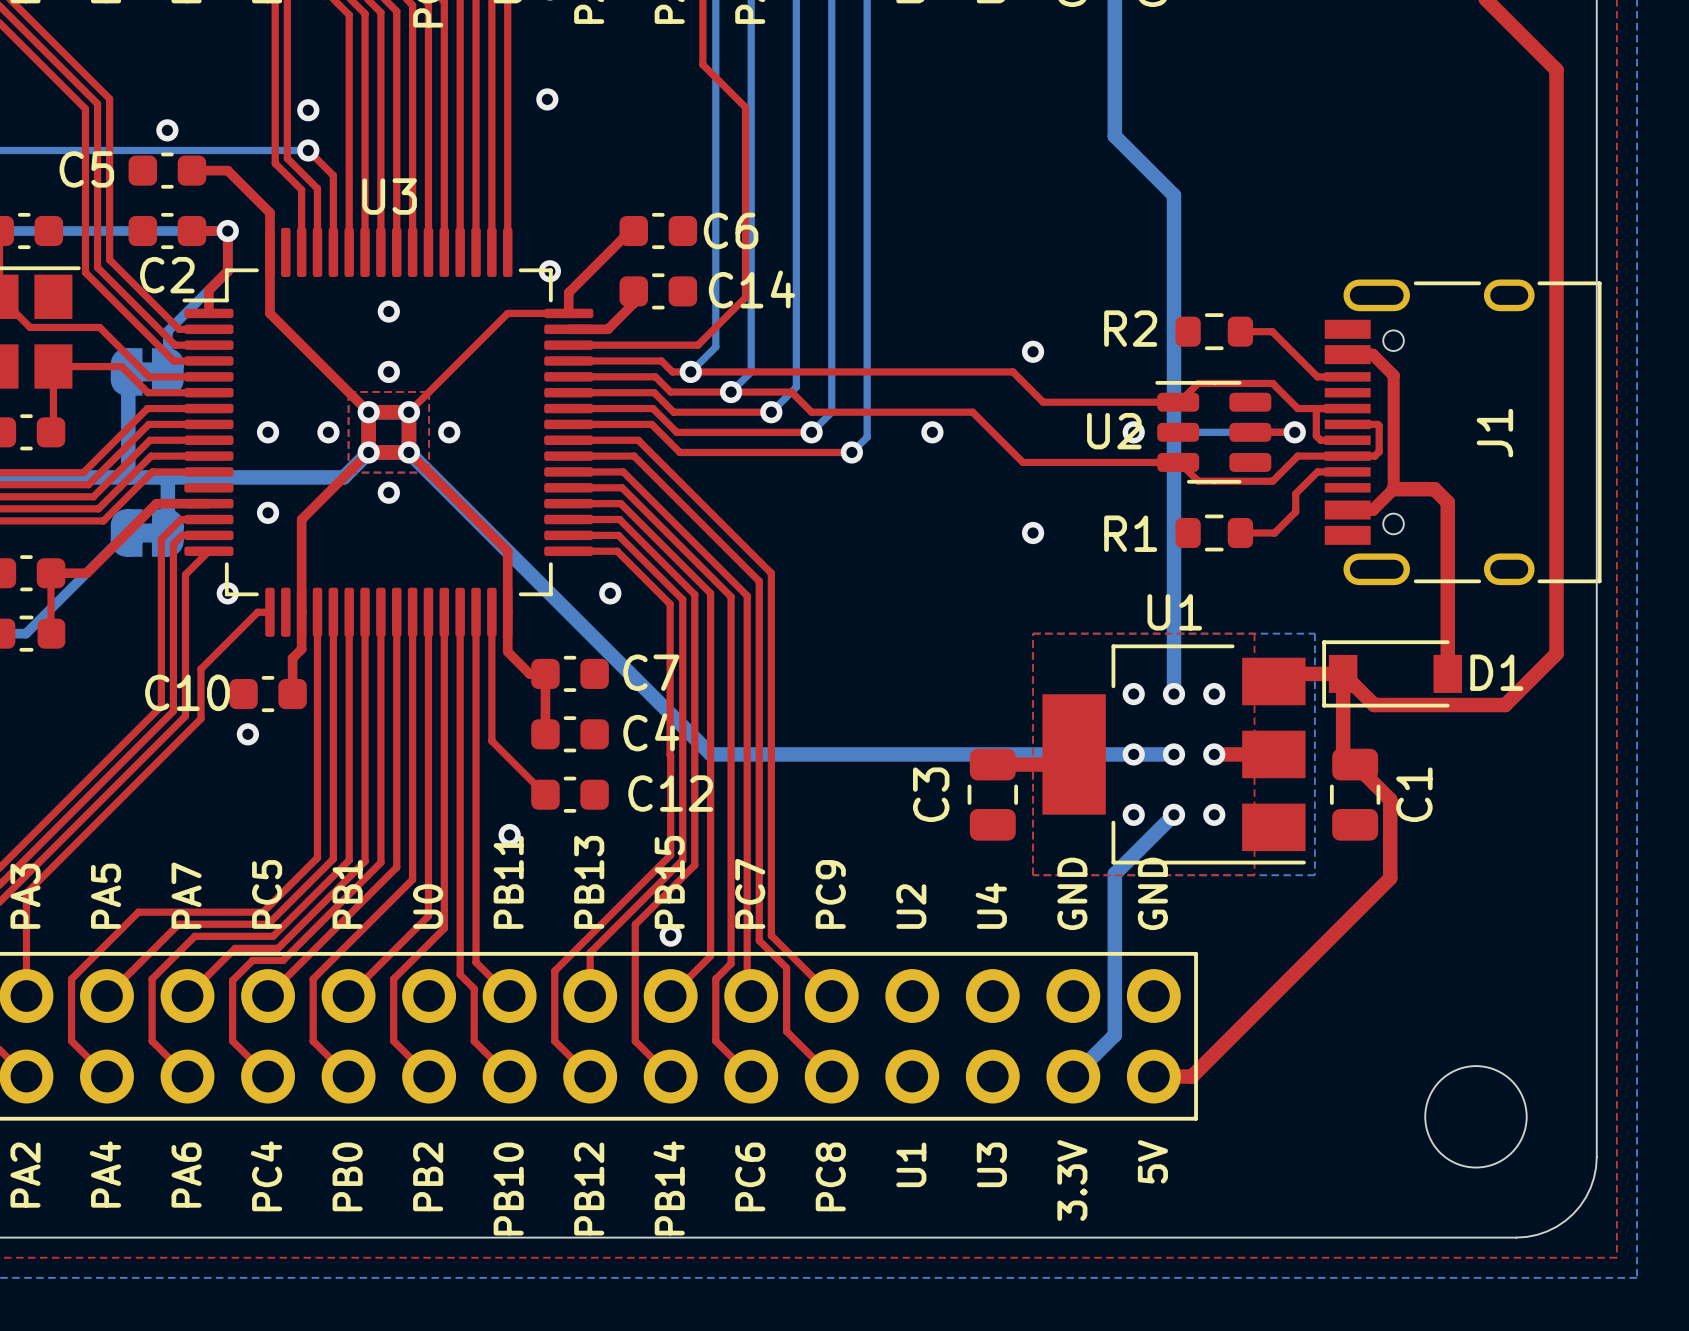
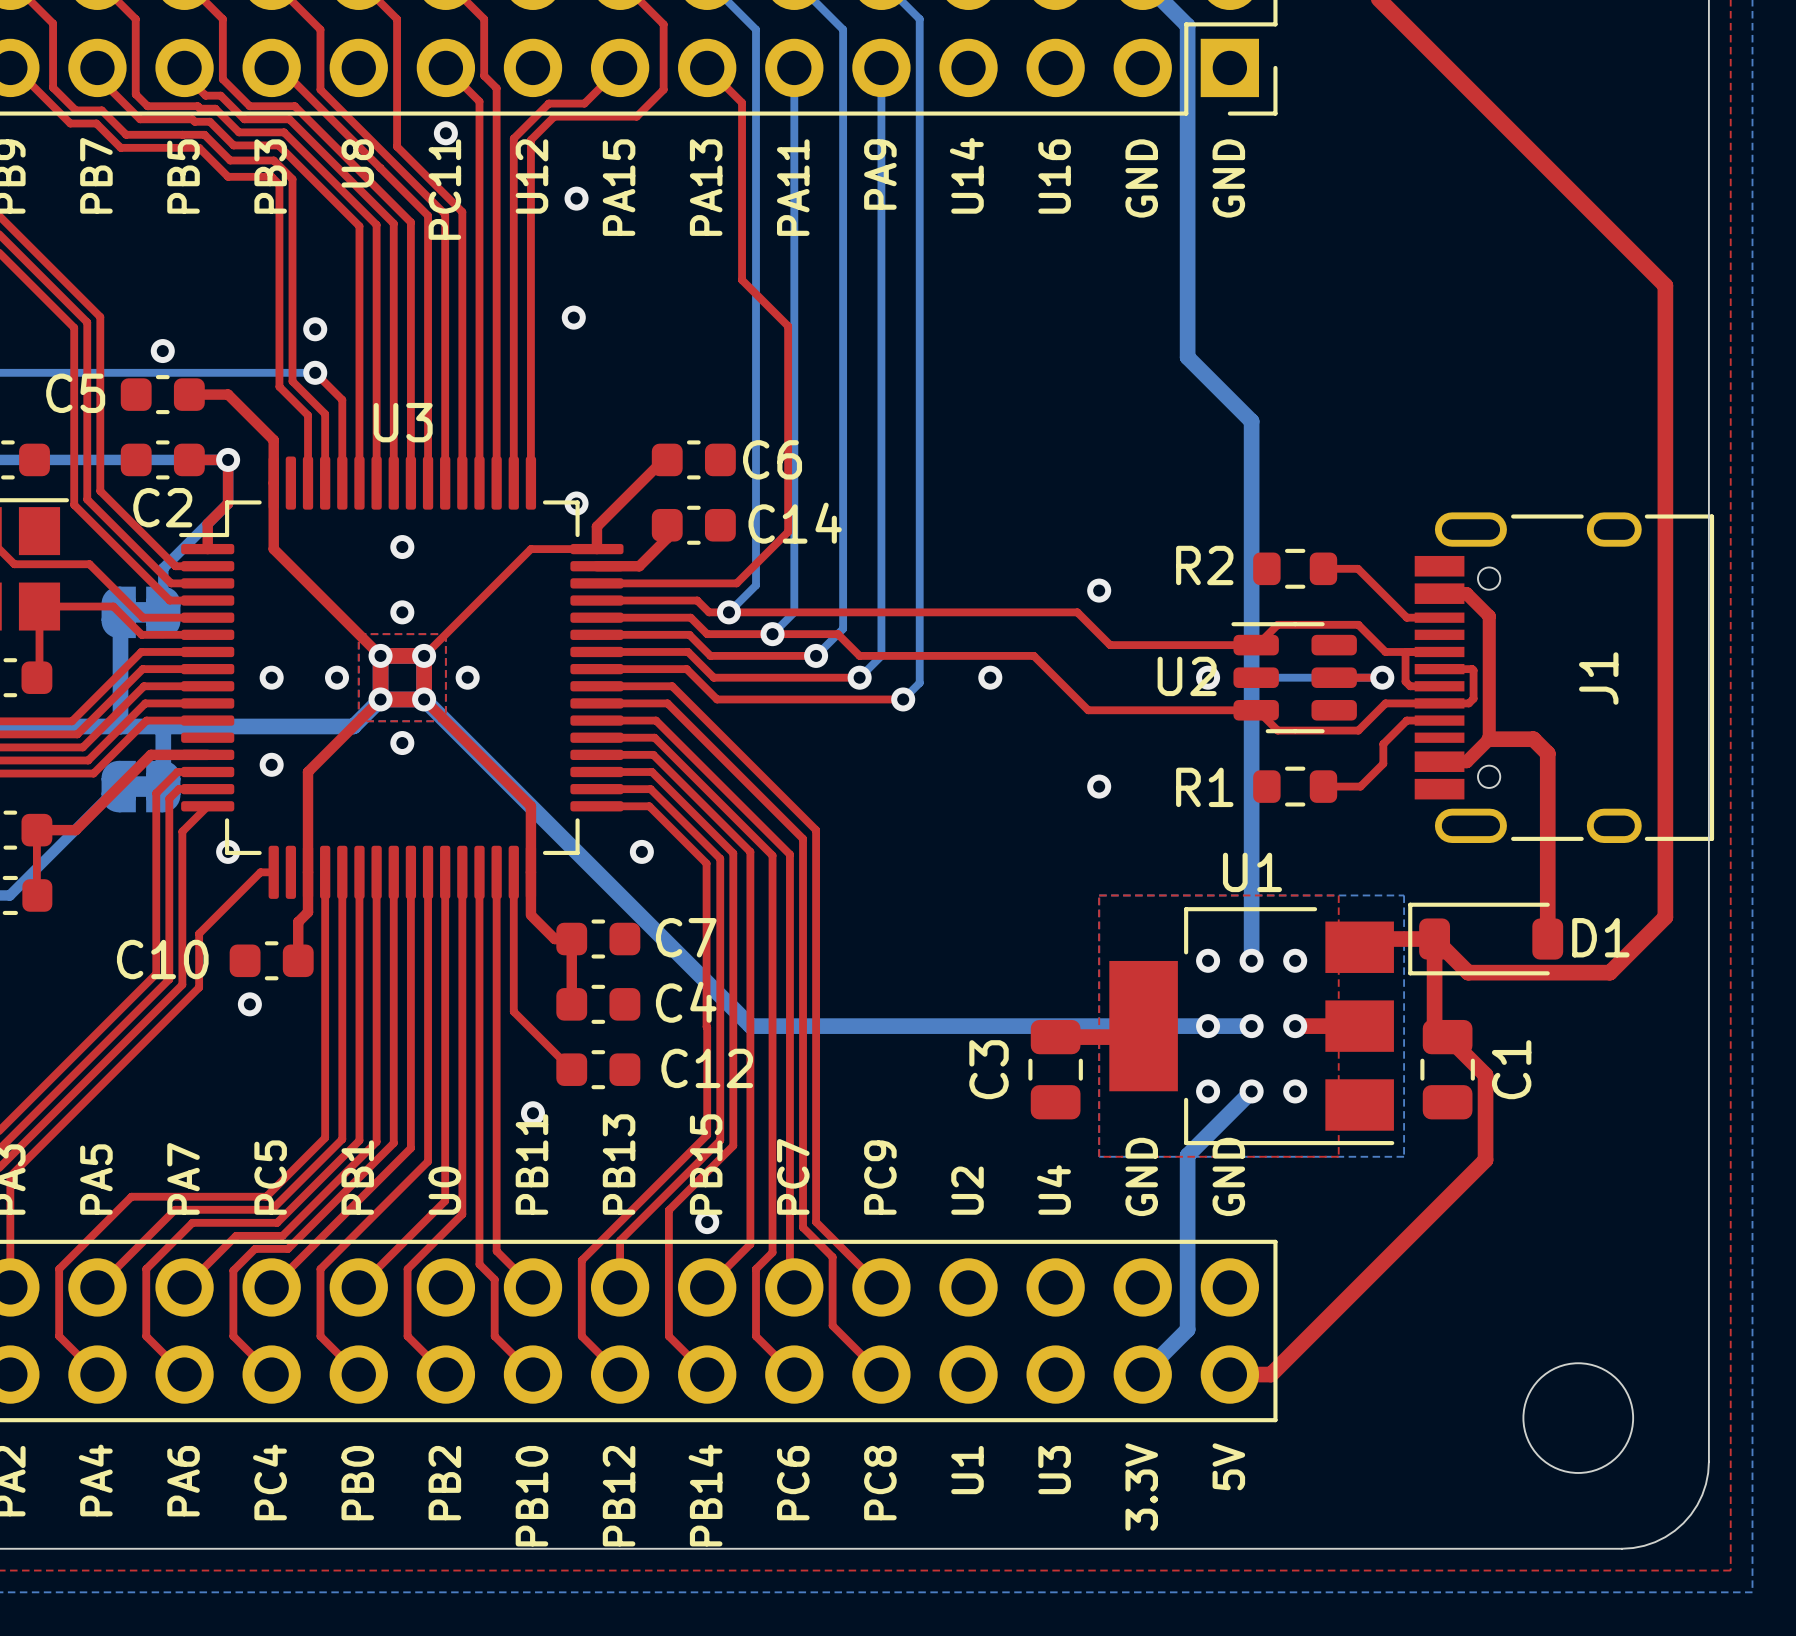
D1 footprint: [1322, 640, 1463, 708] -> [1408, 902, 1564, 976]
C10 name position: C10 (187, 692) -> C10 (162, 959)

